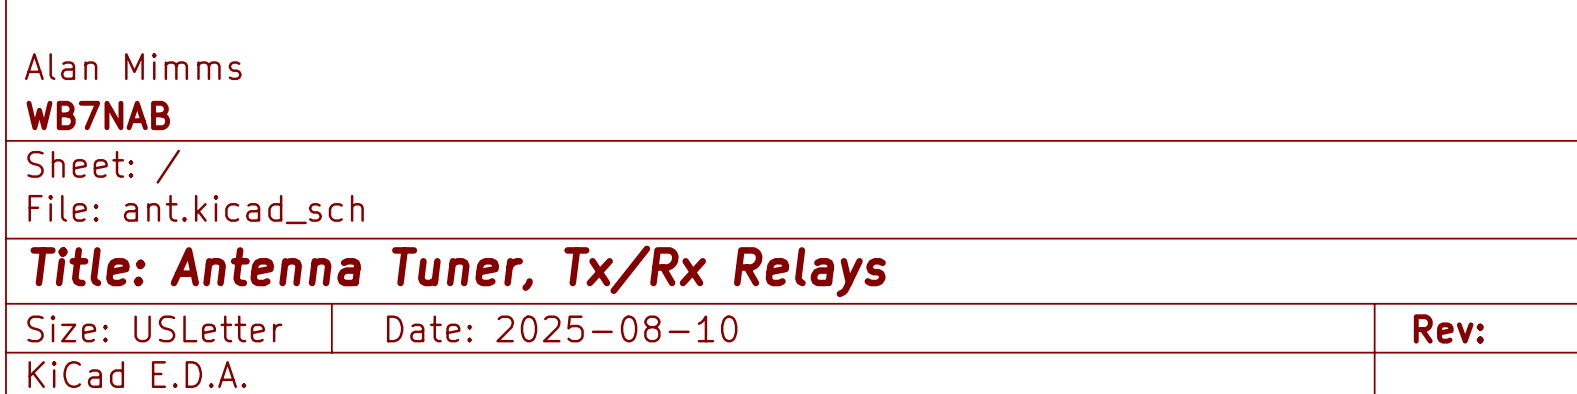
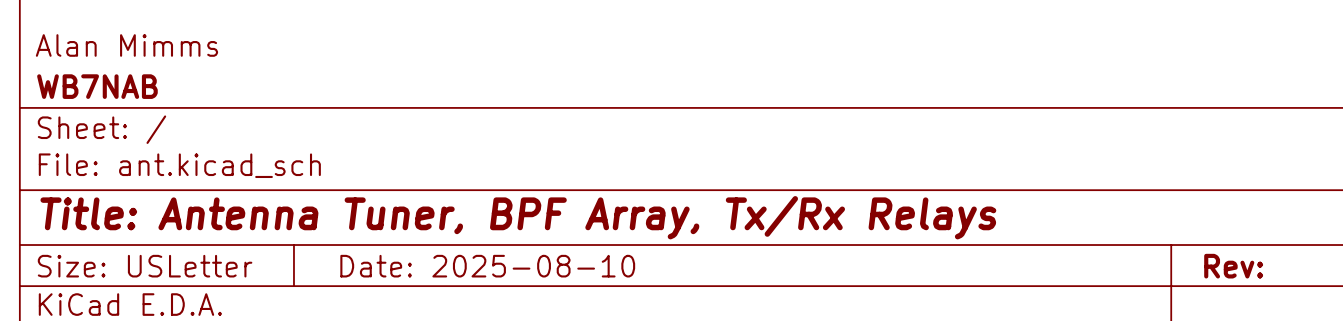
title block: Title: Antenna Tuner, Tx/Rx Relays (458, 271) -> Title: Antenna Tuner, BPF Array, Tx/Rx Relays (518, 217)

